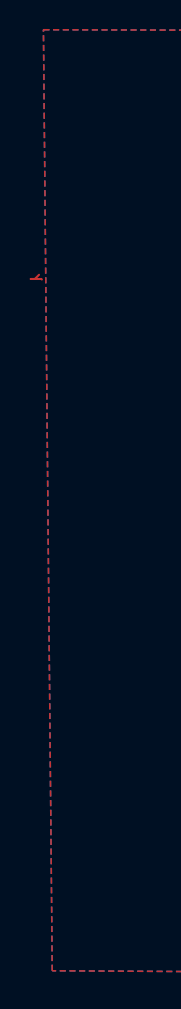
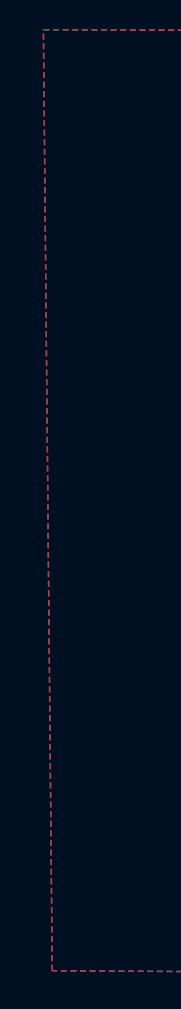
top track: (39, 274) (34, 278) -> none
top track: (30, 278) (41, 279) -> none

